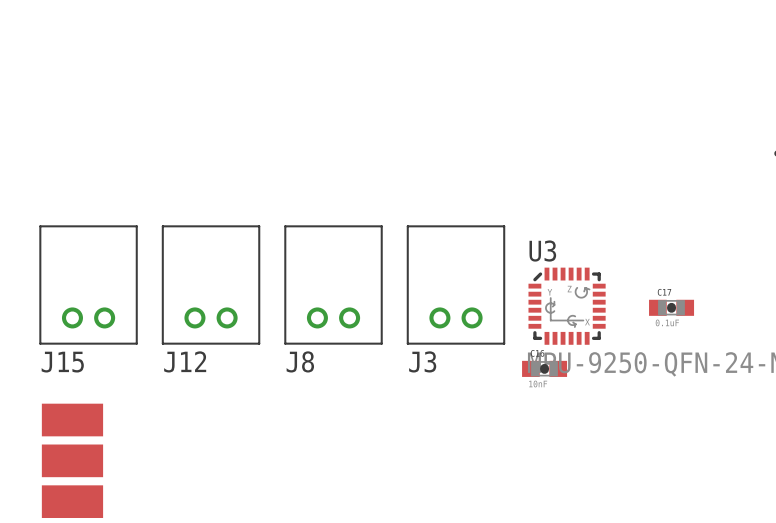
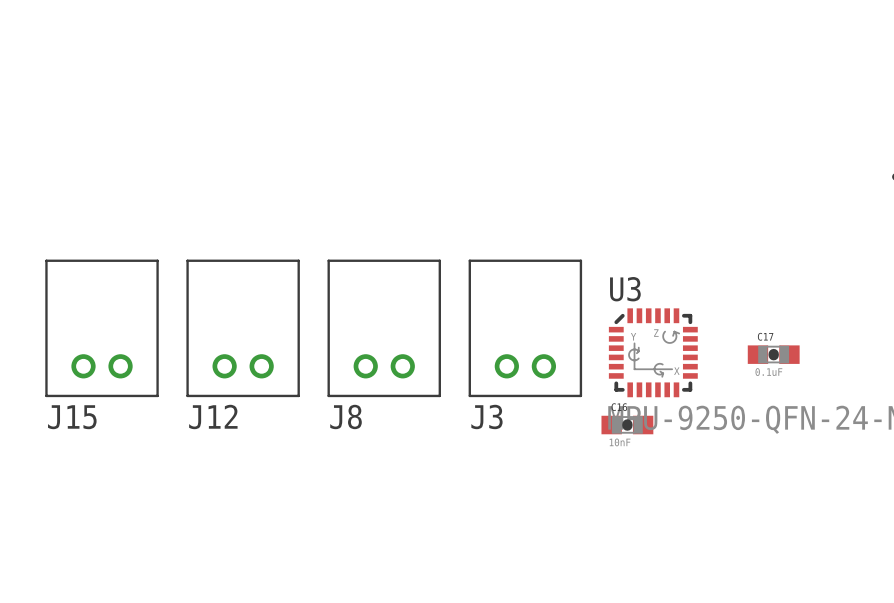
part: (72, 420) -> none
part: (72, 460) -> none
part: (72, 501) -> none

